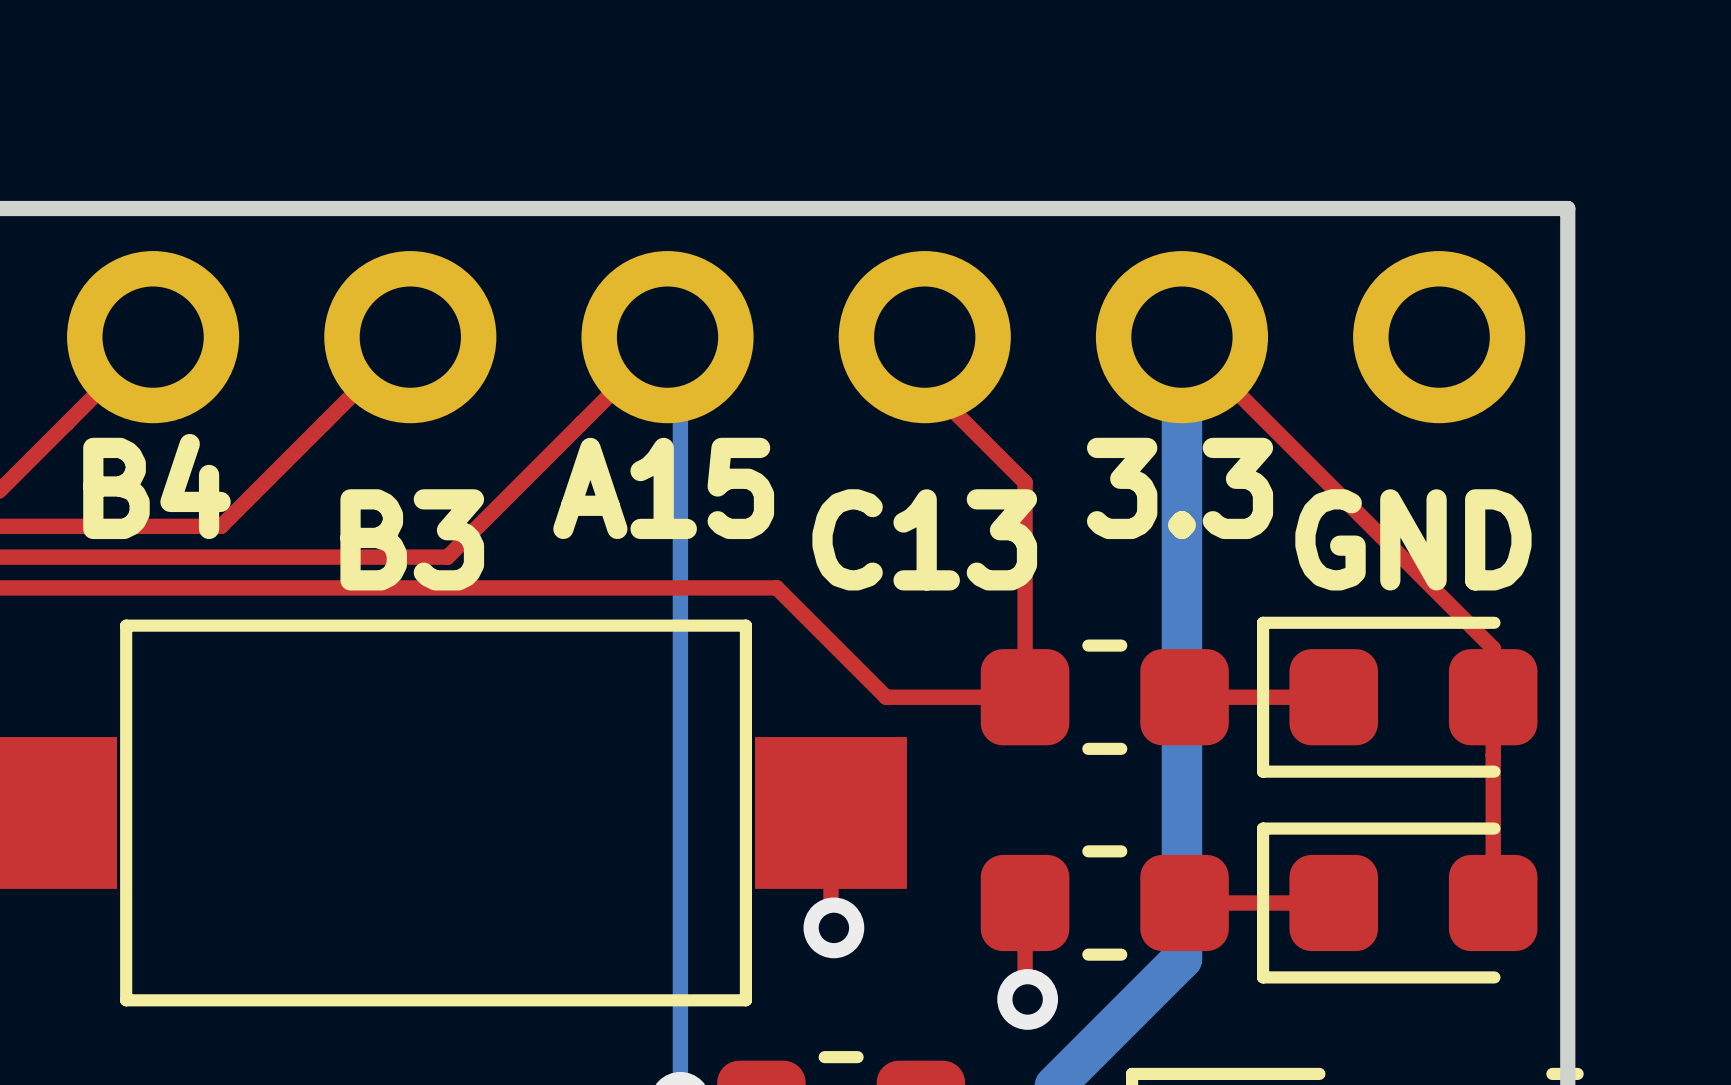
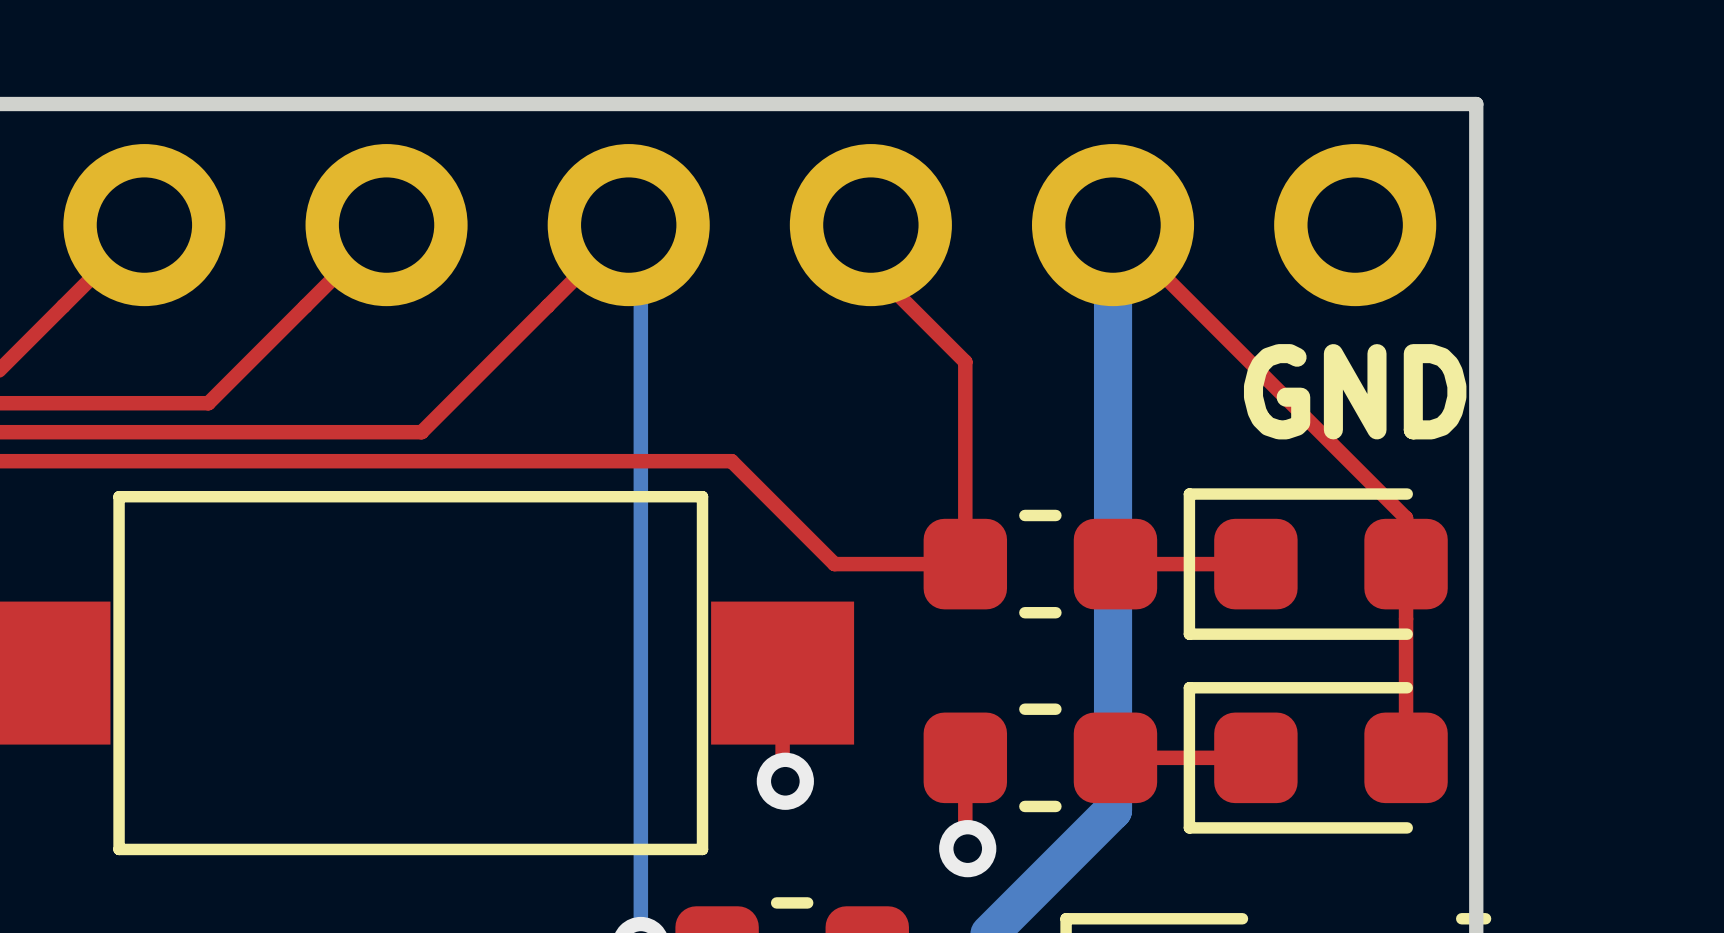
text: B4 (156, 486) -> none
text: A15 (663, 488) -> none
text: 3.3 (1180, 488) -> none
text: B3 (412, 539) -> none
text: C13 (924, 539) -> none
text position: GND (1413, 539) -> GND (1355, 391)

